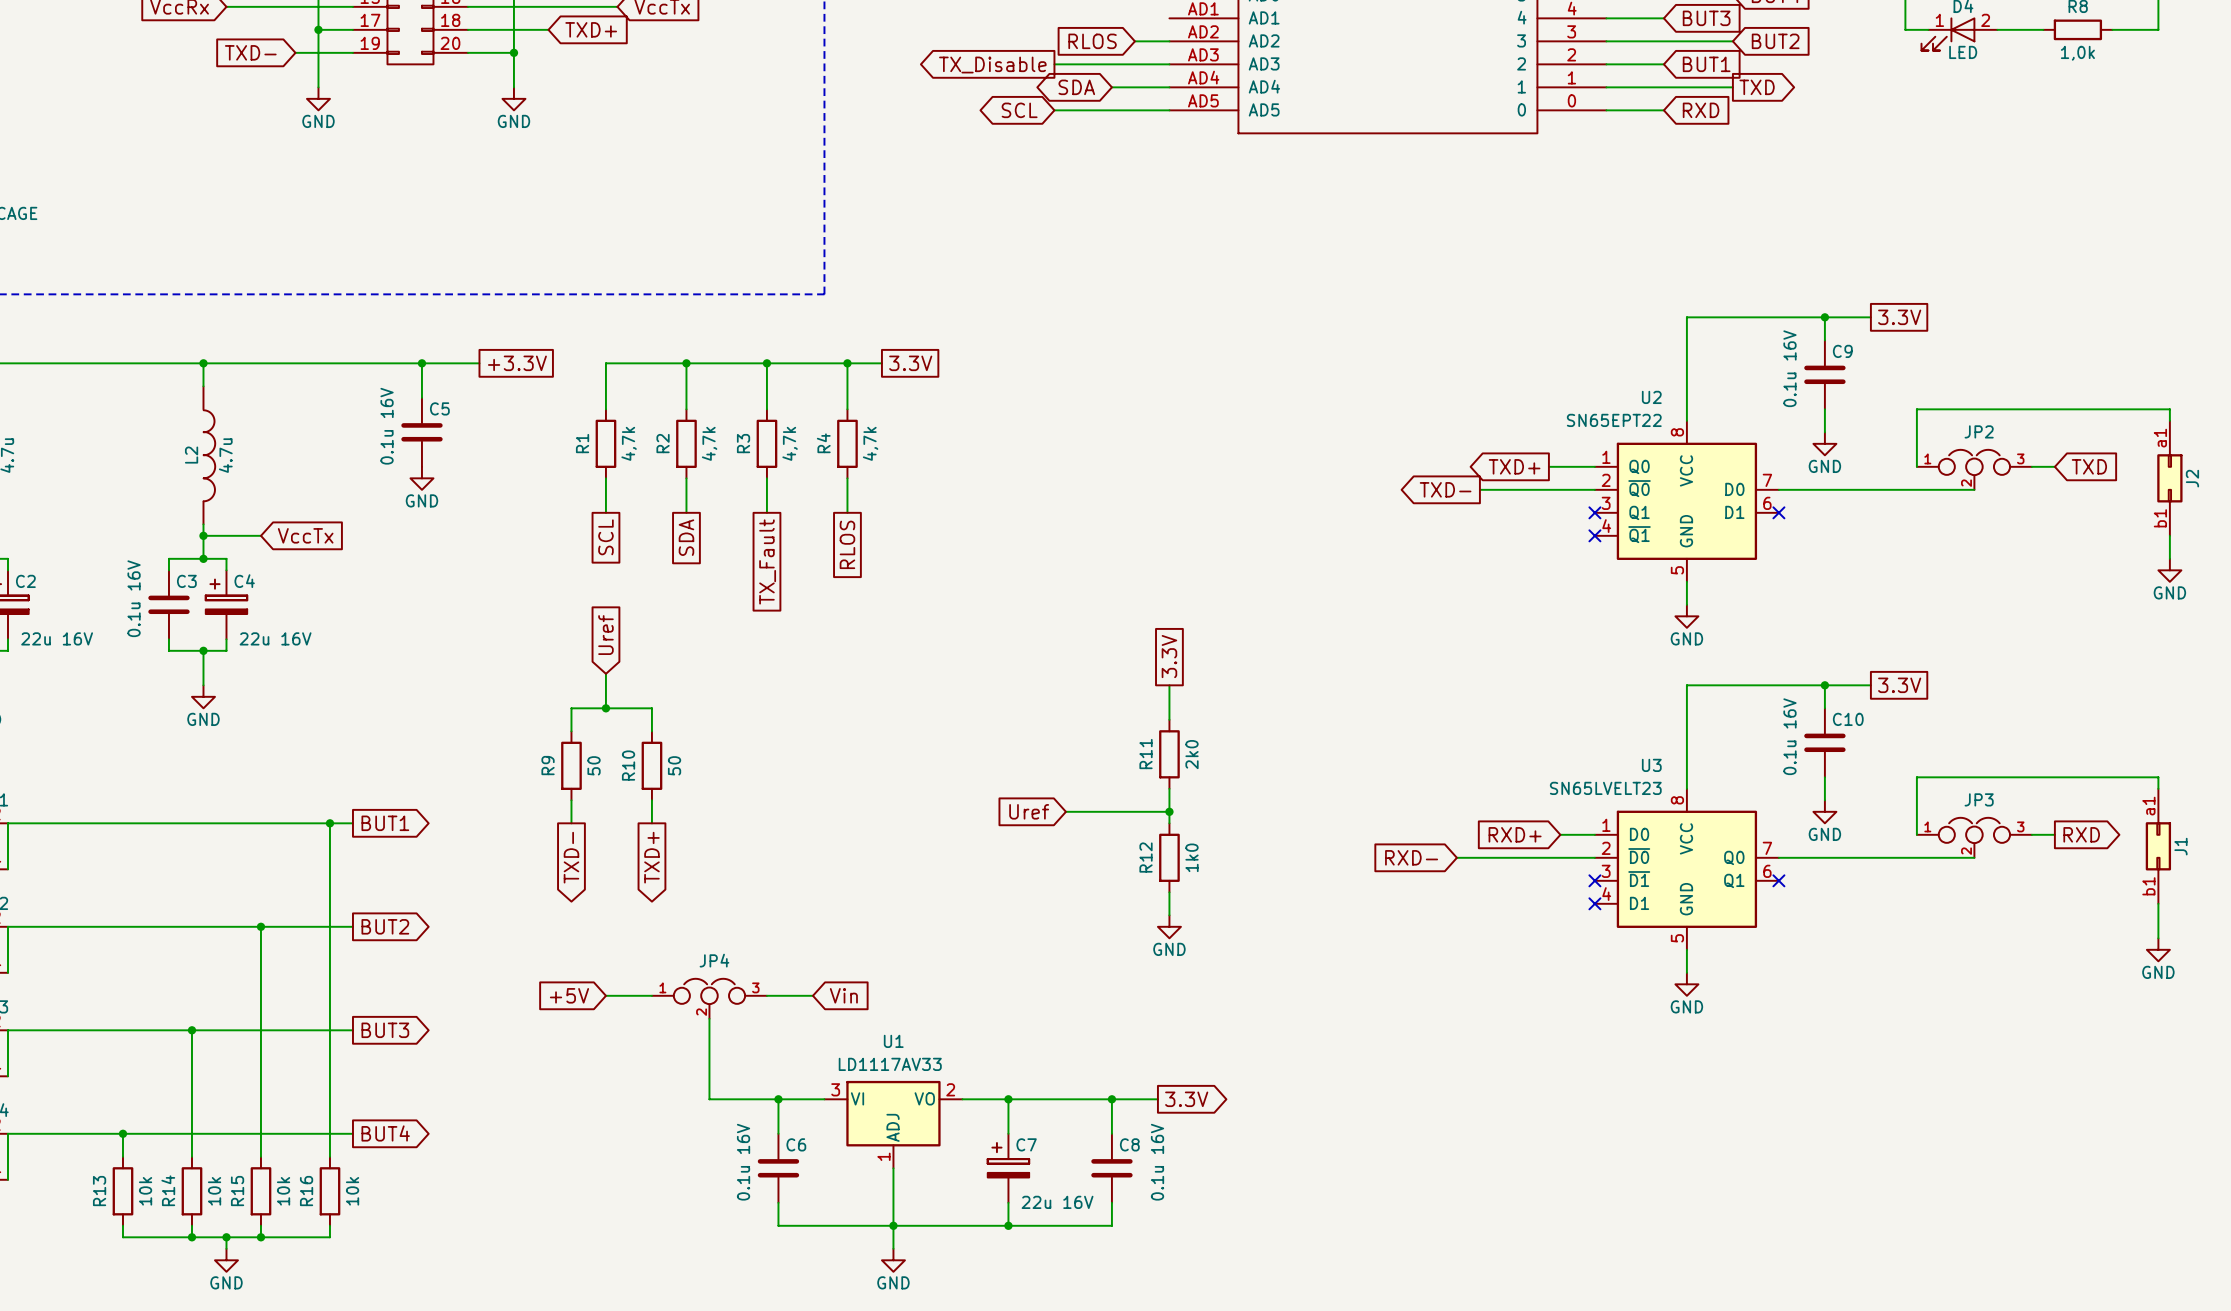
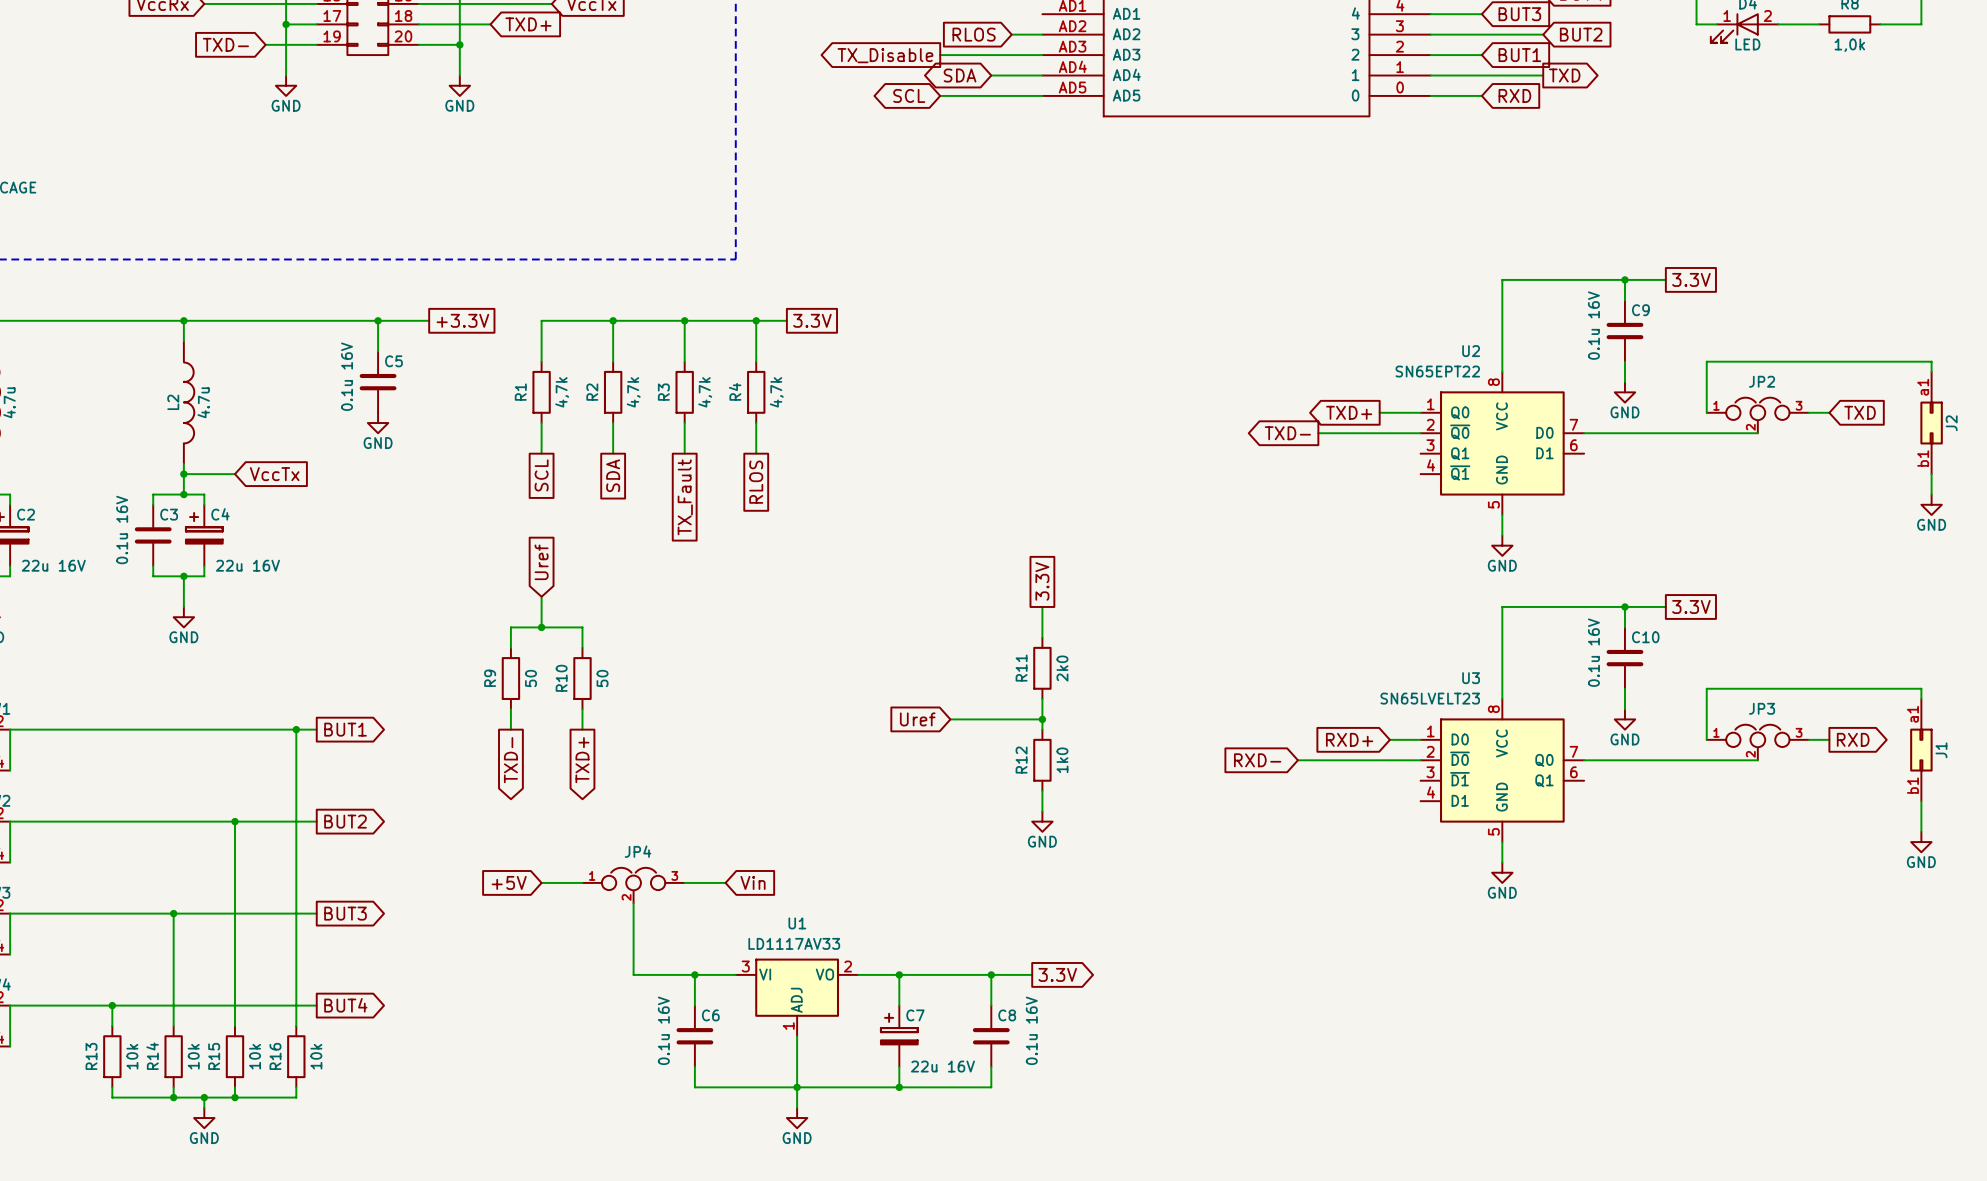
no-connect mark: (1594, 512) -> none
no-connect mark: (1778, 512) -> none
no-connect mark: (1594, 535) -> none
no-connect mark: (1594, 880) -> none
no-connect mark: (1778, 880) -> none
no-connect mark: (1594, 903) -> none

